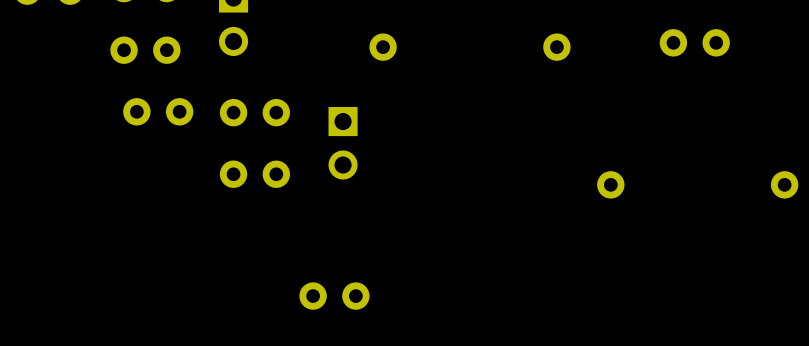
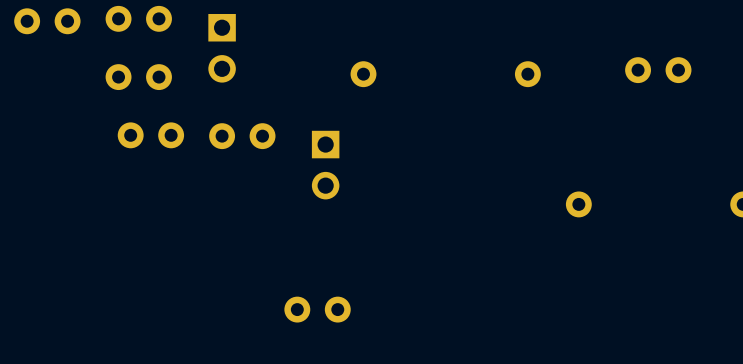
part: (254, 174) -> none

